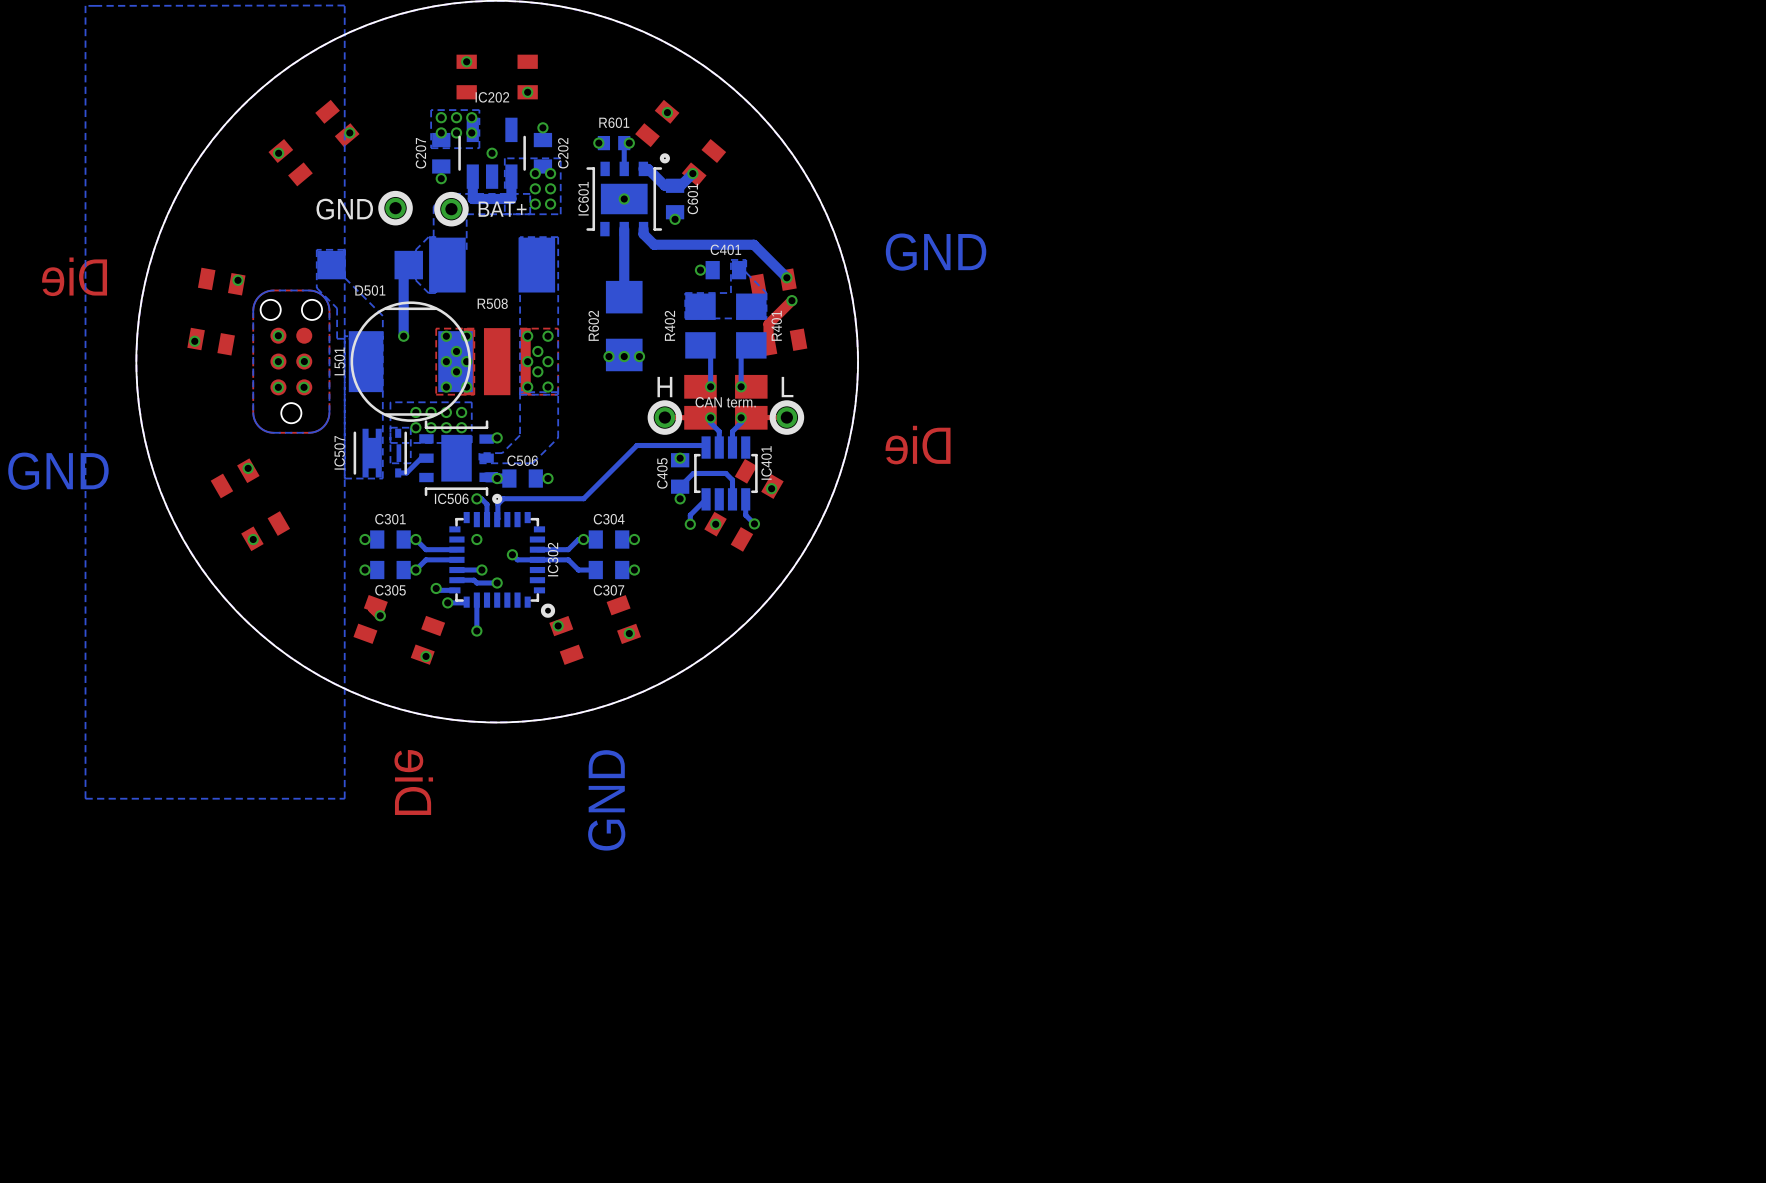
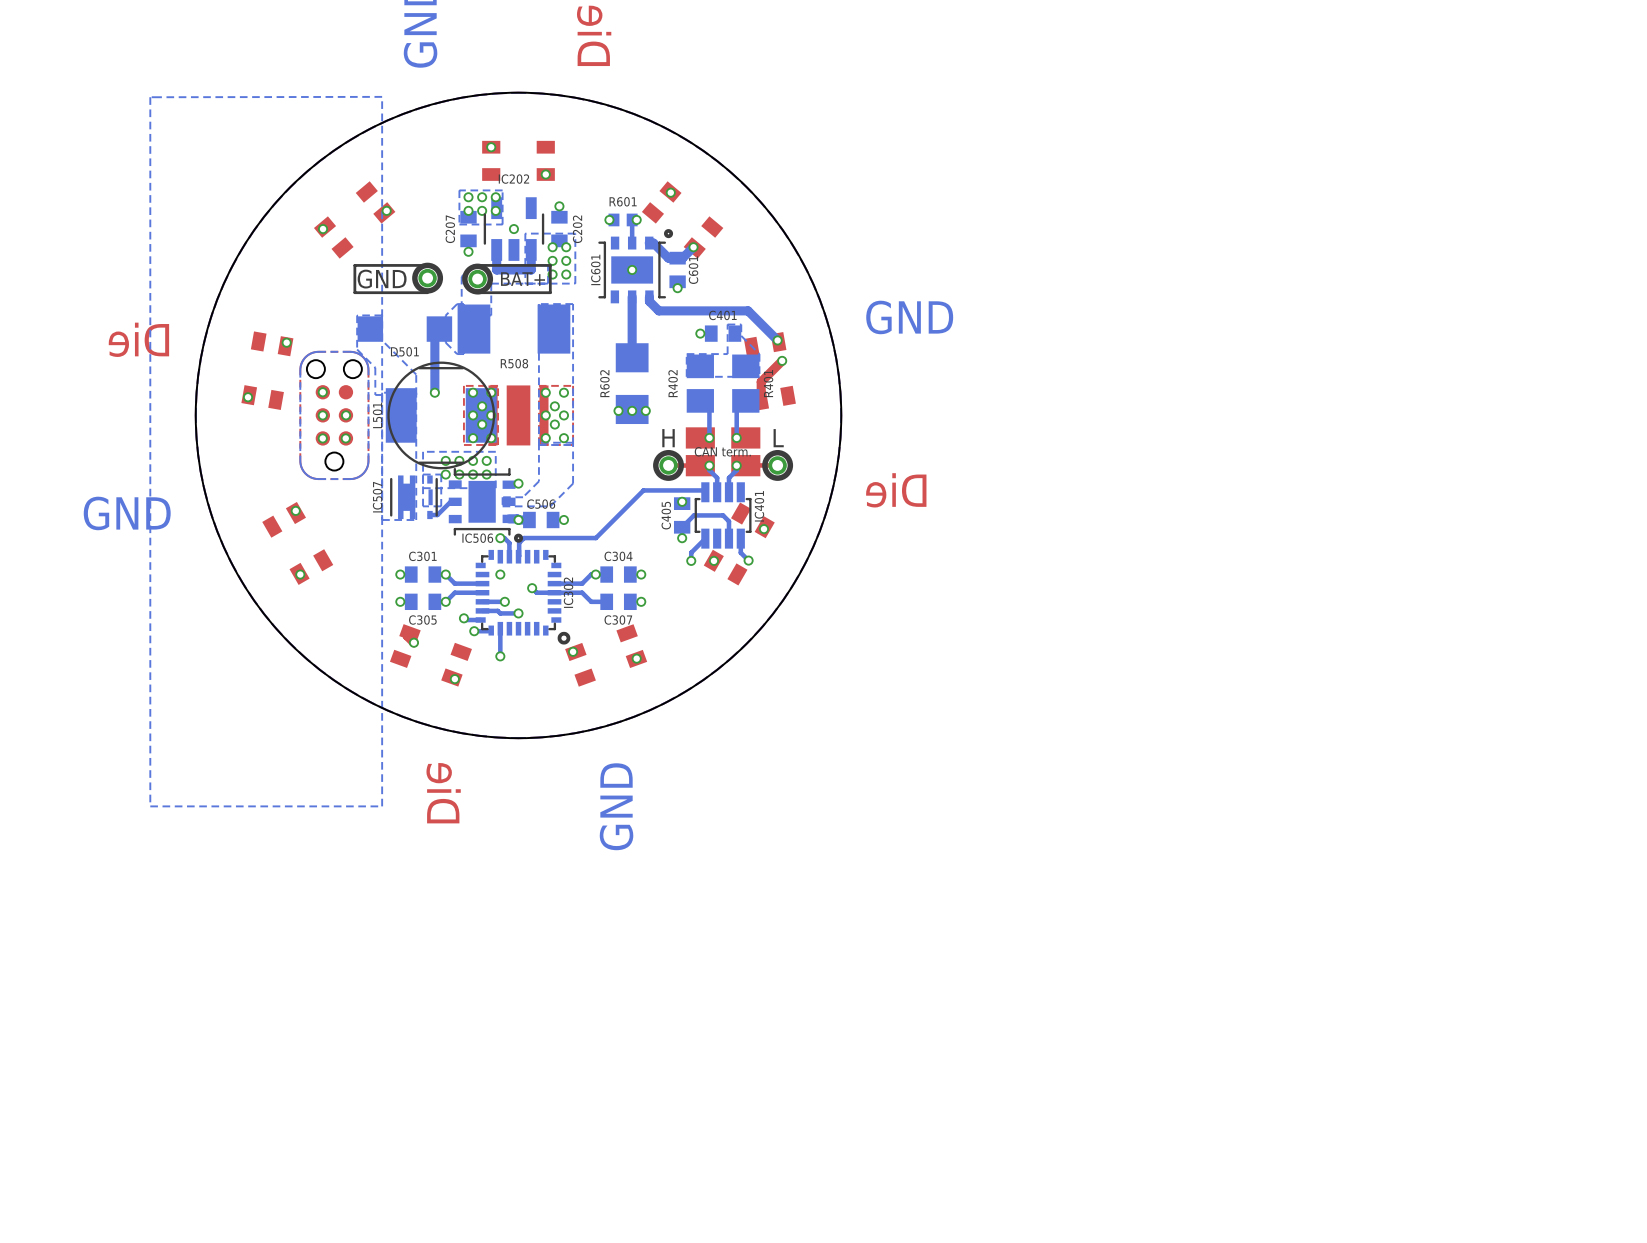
line: none -> (427, 265) (354, 265) (354, 292) (427, 292)
line: none -> (477, 265) (550, 265) (550, 292) (477, 292)

